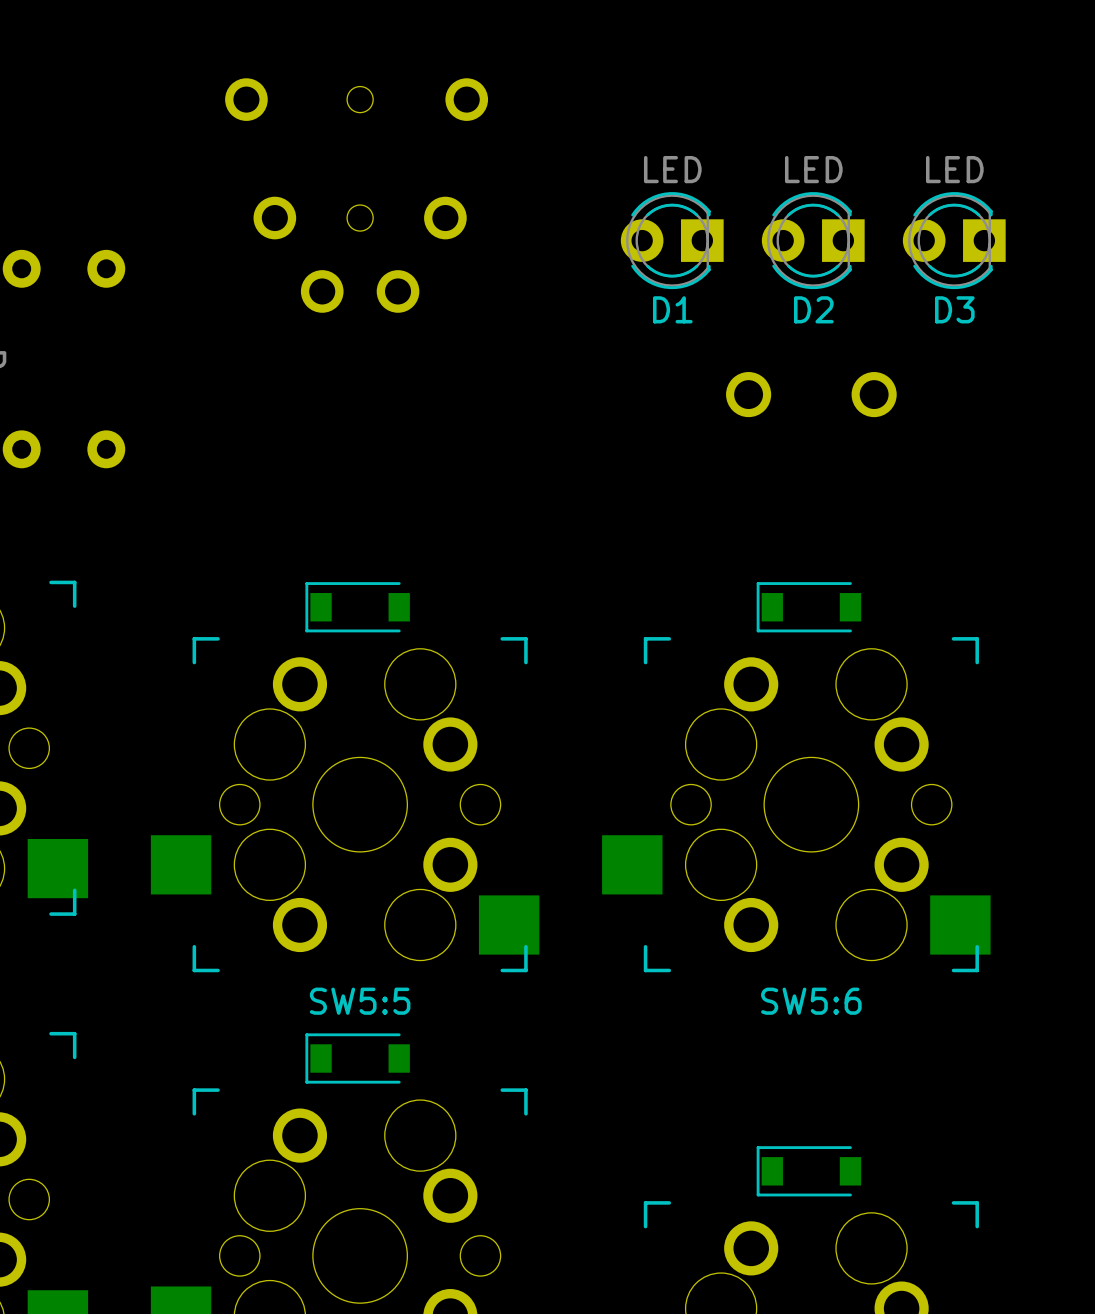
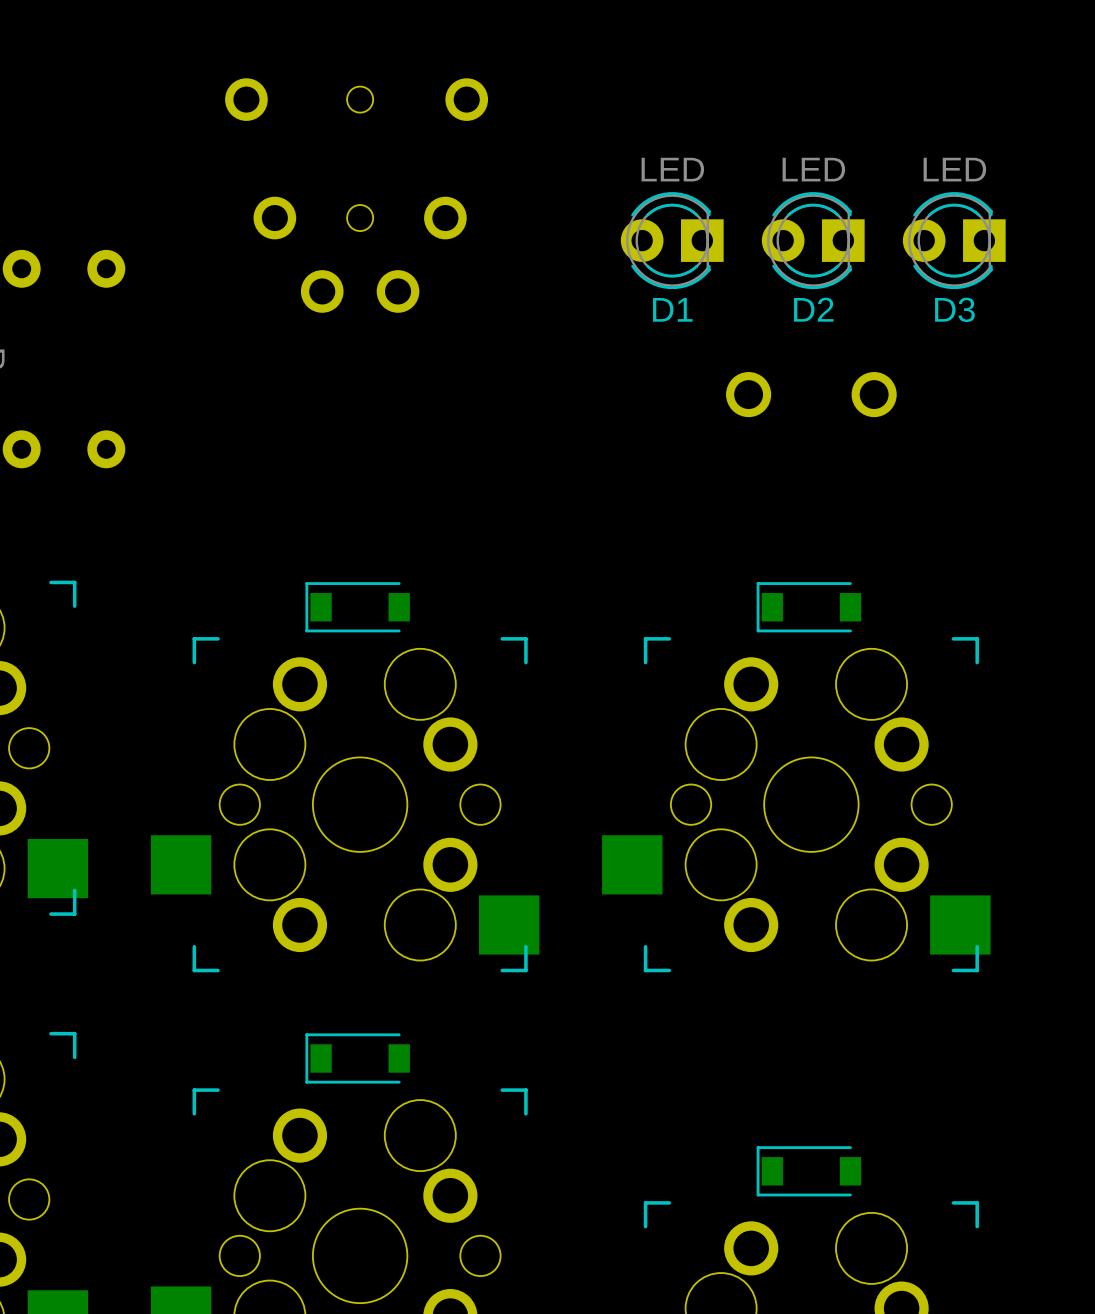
text: SW5:5 (360, 1001) -> none
text: SW5:6 (811, 1001) -> none

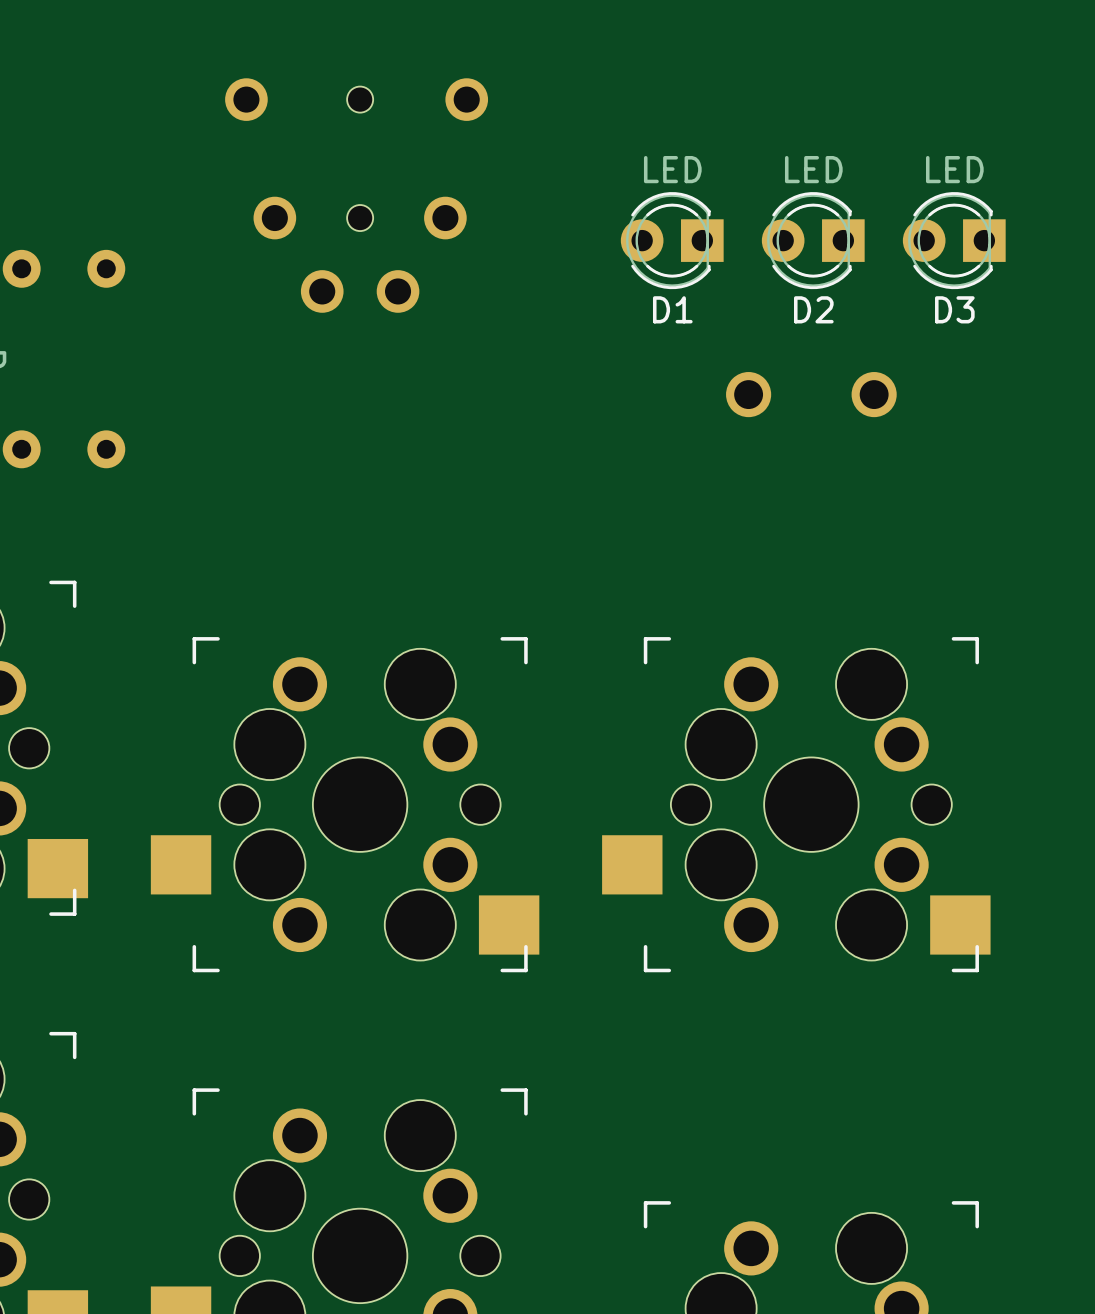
part: (357, 607) -> none
part: (808, 607) -> none
part: (357, 1058) -> none
part: (808, 1171) -> none

